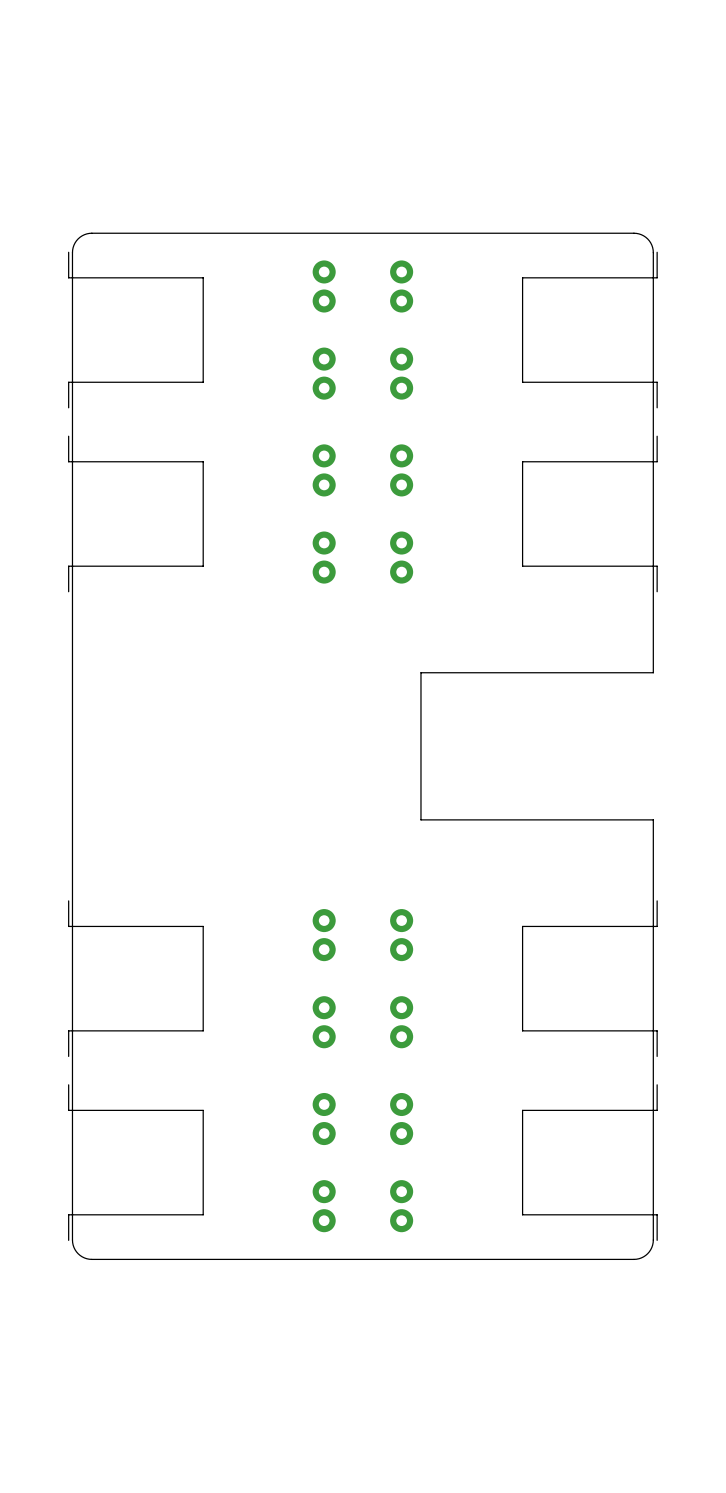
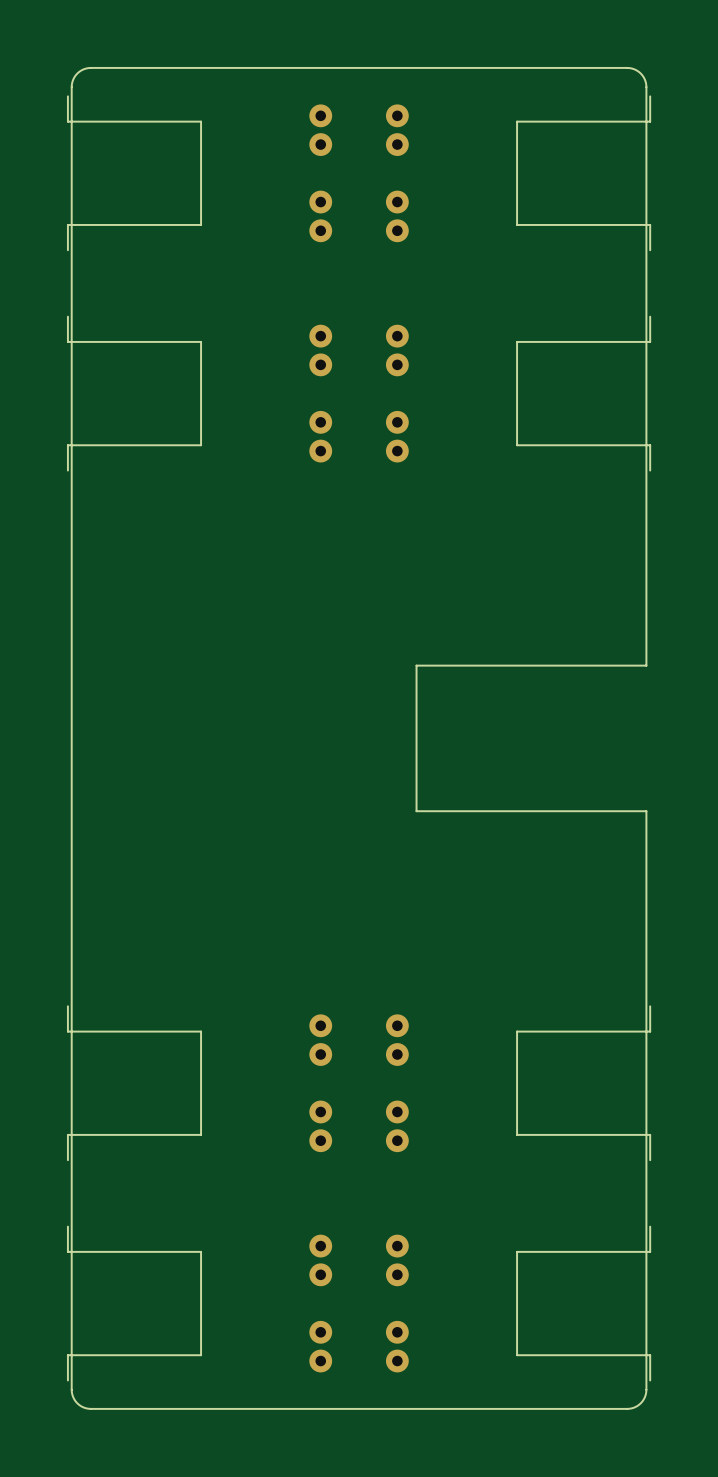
via: none -> (320, 115)
via: none -> (397, 115)
via: none -> (320, 144)
via: none -> (397, 144)
part: none -> (134, 173)
part: none -> (583, 173)
via: none -> (320, 202)
via: none -> (397, 202)
via: none -> (320, 230)
via: none -> (397, 230)
board edge: (653, 252) (647, 238) (633, 233) (91, 233) (78, 238) (72, 252) -> (646, 249) (646, 84) (638, 71) (627, 67) (85, 68) (75, 75) (71, 84) (71, 249)
via: (324, 271) -> none
via: (401, 271) -> none
via: (324, 301) -> none
via: (401, 301) -> none
part: (135, 330) -> none
part: (589, 330) -> none
via: none -> (320, 336)
via: none -> (397, 336)
via: (324, 359) -> none
via: (401, 359) -> none
via: none -> (320, 364)
via: none -> (397, 364)
via: (324, 388) -> none
via: (401, 388) -> none
part: none -> (134, 393)
part: none -> (583, 393)
via: none -> (320, 422)
via: none -> (397, 422)
via: (324, 484) -> none
via: (401, 484) -> none
part: (135, 513) -> none
part: (589, 513) -> none
via: (324, 543) -> none
via: (401, 543) -> none
via: (324, 572) -> none
via: (401, 572) -> none
via: (324, 920) -> none
via: (401, 920) -> none
via: (324, 949) -> none
via: (401, 949) -> none
part: (135, 978) -> none
part: (589, 978) -> none
via: (324, 1007) -> none
via: (401, 1007) -> none
via: none -> (320, 1054)
via: none -> (397, 1054)
part: none -> (134, 1083)
part: none -> (583, 1083)
via: (324, 1104) -> none
via: (401, 1104) -> none
via: none -> (320, 1111)
via: none -> (397, 1111)
via: (324, 1133) -> none
via: (401, 1133) -> none
via: none -> (320, 1140)
via: none -> (397, 1140)
part: (135, 1162) -> none
part: (589, 1162) -> none
via: (324, 1191) -> none
via: (401, 1191) -> none
via: (324, 1220) -> none
via: (401, 1220) -> none
board edge: (653, 1240) (647, 1253) (633, 1259) (91, 1259) (78, 1253) (72, 1240) -> (646, 1226) (646, 1392) (638, 1404) (627, 1408) (85, 1408) (75, 1401) (71, 1392) (71, 1226)
via: none -> (320, 1246)
via: none -> (397, 1246)
via: none -> (320, 1274)
via: none -> (397, 1274)
part: none -> (134, 1303)
part: none -> (583, 1303)
via: none -> (320, 1332)
via: none -> (397, 1332)
via: none -> (320, 1361)
via: none -> (397, 1361)

